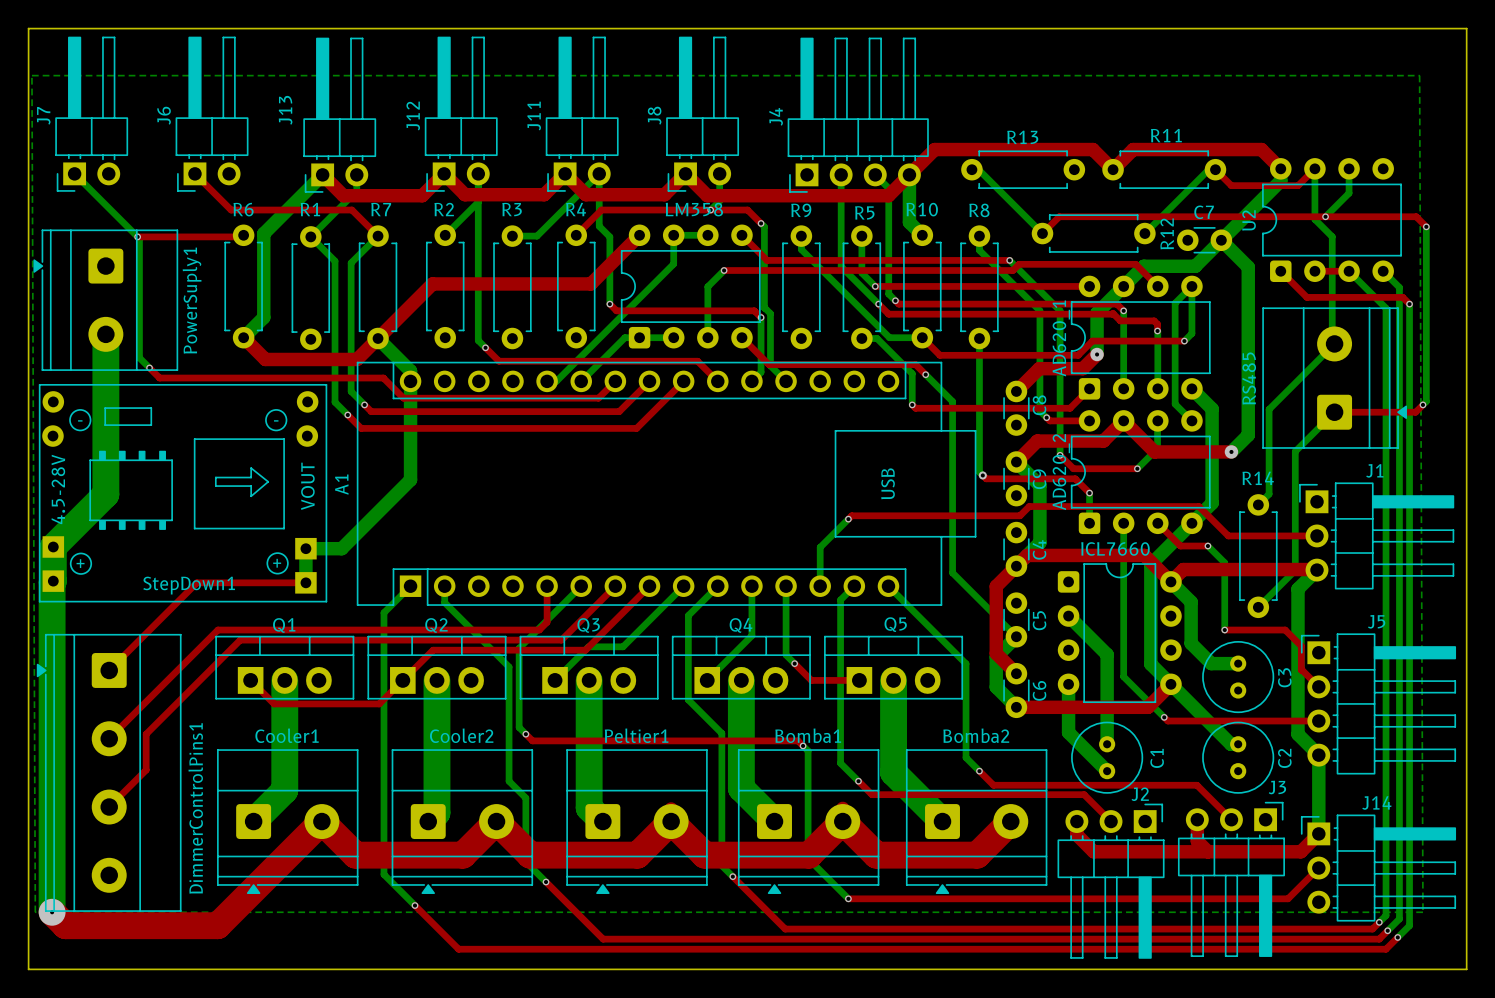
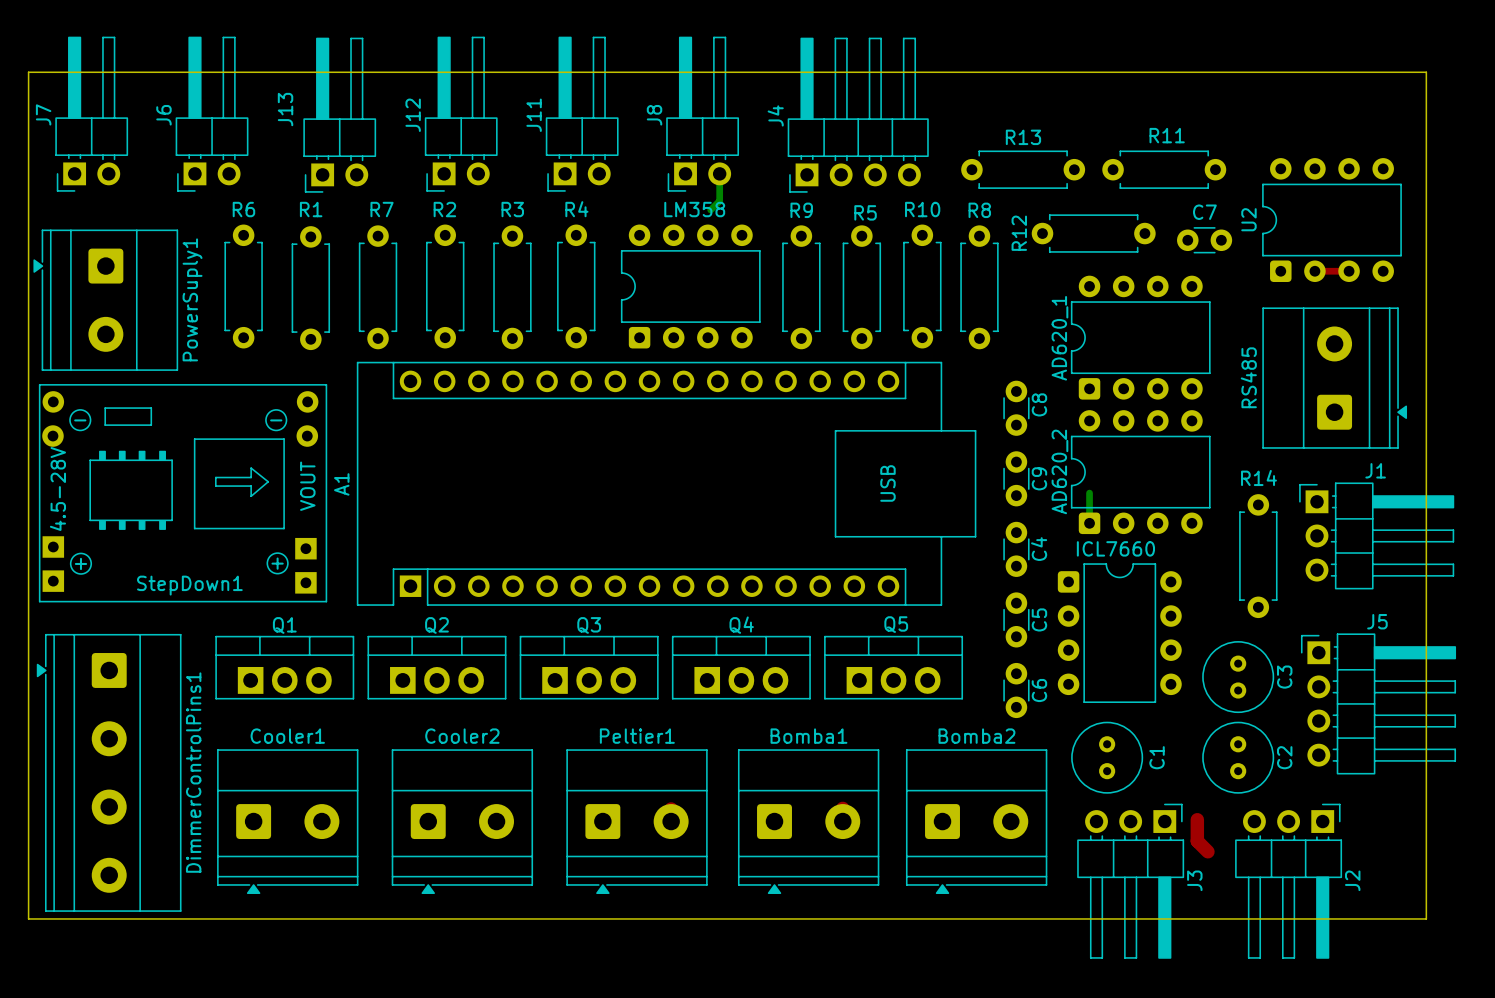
board edge: (28, 72) (28, 28) (1466, 28) (1466, 969) (28, 969) (28, 918) -> (28, 72) (1426, 72) (1426, 918) (28, 918)
bottom zone outline: (31, 75) (1419, 75) (1422, 912) (35, 912) (31, 75) -> none
top track: (1280, 168) (1261, 149) (1133, 149) (1113, 169) (1092, 149) (934, 149) (888, 195) (707, 195) (685, 173) (664, 194) (585, 194) (565, 173) (544, 194) (464, 194) (444, 173) (422, 195) (343, 195) (322, 174) -> none
bottom track: (1280, 168) (1280, 180) (1195, 266) (1143, 266) (1097, 313) (1097, 354) -> none
top track: (1314, 168) (1298, 185) (1231, 185) (1215, 169) -> none
bottom track: (1314, 168) (1314, 219) (1332, 236) (1332, 341) (1334, 343) (1269, 409) (1269, 494) (1258, 504) -> none
bottom track: (1349, 168) (1349, 193) (1325, 216) -> none
bottom track: (971, 169) (978, 169) (1042, 233) -> none
bottom track: (1215, 169) (1208, 169) (1144, 233) -> none
bottom track: (74, 173) (139, 238) (139, 357) (149, 367) -> none
top track: (194, 173) (231, 210) (351, 210) (378, 236) -> none
bottom track: (478, 173) (478, 340) (485, 347) -> none
bottom track: (322, 174) (263, 233) (263, 317) (243, 337) -> none
bottom track: (356, 174) (356, 190) (310, 236) (335, 261) (335, 402) (347, 414) -> none
bottom track: (841, 174) (841, 266) (878, 304) -> none
bottom track: (875, 174) (888, 188) (888, 294) (895, 300) -> none
bottom track: (909, 174) (909, 222) (922, 235) -> none
bottom track: (478, 202) (445, 235) -> none
via: (710, 210) -> none
via: (1325, 216) -> none
top track: (761, 223) (747, 210) (601, 210) (576, 235) -> none
bottom track: (761, 223) (764, 226) (764, 308) (770, 313) (770, 365) (786, 381) -> none
via: (761, 223) -> none
top track: (1426, 226) (1416, 216) (1059, 216) (1042, 233) -> none
bottom track: (1426, 226) (1426, 401) (1422, 404) -> none
via: (1426, 226) -> none
R12 name position: R12 (1167, 233) -> R12 (1019, 233)
top track: (243, 235) (242, 236) (137, 236) -> none
top track: (639, 235) (590, 283) (432, 283) (357, 359) (265, 359) (243, 337) -> none
bottom track: (707, 235) (673, 235) (673, 264) (556, 381) (547, 381) -> none
top track: (741, 235) (767, 260) (1009, 260) -> none
via: (137, 236) -> none
bottom track: (378, 236) (351, 262) (351, 391) (364, 404) -> none
bottom track: (512, 236) (537, 236) (599, 173) (599, 226) (609, 236) (609, 304) -> none
bottom track: (801, 236) (801, 249) (889, 337) (922, 337) -> none
bottom track: (861, 236) (861, 272) (875, 286) -> none
bottom track: (979, 236) (979, 250) (1039, 310) (1039, 410) (1046, 417) -> none
bottom track: (1221, 240) (1248, 267) (1248, 435) (1231, 451) -> none
bottom track: (1009, 260) (1060, 310) (1060, 455) -> none
via: (1009, 260) -> none
top track: (724, 270) (1012, 270) (1019, 264) (1135, 264) (1157, 286) -> none
bottom track: (724, 270) (707, 286) (707, 337) -> none
via: (724, 270) -> none
top track: (1280, 271) (1306, 297) (1402, 297) (1409, 304) -> none
bottom track: (1349, 271) (1386, 308) (1386, 915) (1379, 922) -> none
bottom track: (1383, 271) (1399, 287) (1399, 918) (1387, 930) -> none
top track: (875, 286) (1089, 286) -> none
via: (875, 286) -> none
top track: (895, 300) (898, 304) (1116, 304) (1123, 310) -> none
via: (895, 300) -> none
top track: (609, 304) (616, 310) (754, 310) (761, 317) -> none
via: (609, 304) -> none
top track: (878, 304) (888, 314) (1113, 313) (1120, 320) (1154, 320) (1157, 324) (1157, 330) -> none
via: (878, 304) -> none
bottom track: (1409, 304) (1409, 925) (1397, 937) -> none
via: (1409, 304) -> none
bottom track: (1123, 310) (1123, 388) -> none
via: (1123, 310) -> none
bottom track: (761, 317) (761, 372) (751, 381) -> none
via: (761, 317) -> none
bottom track: (1157, 330) (1157, 388) -> none
via: (1157, 330) -> none
bottom track: (105, 334) (105, 494) (53, 546) (52, 912) -> none
bottom track: (673, 337) (624, 337) (581, 381) -> none
top track: (741, 337) (768, 364) (915, 364) (925, 374) -> none
top track: (922, 337) (939, 355) (1078, 355) (1092, 341) (1184, 341) -> none
bottom track: (378, 338) (410, 371) (410, 479) (341, 548) (305, 548) (305, 582) -> none
bottom track: (861, 338) (877, 338) (912, 373) (912, 404) -> none
bottom track: (979, 338) (979, 472) (982, 475) -> none
bottom track: (1184, 341) (1191, 333) (1191, 286) (1175, 303) (1175, 404) (1191, 420) -> none
via: (1184, 341) -> none
top track: (485, 347) (498, 361) (697, 361) (717, 381) -> none
via: (485, 347) -> none
top track: (1097, 354) (1082, 368) (1039, 368) (1016, 391) -> none
via: (1097, 354) -> none
top track: (149, 367) (159, 378) (383, 378) (403, 398) (598, 398) (615, 381) -> none
via: (149, 367) -> none
bottom track: (925, 374) (952, 401) (952, 572) (1016, 636) (996, 656) (996, 687) (1016, 707) -> none
via: (925, 374) -> none
top track: (649, 381) (619, 411) (371, 411) (364, 404) -> none
top track: (683, 381) (636, 428) (361, 428) (347, 414) -> none
top track: (1089, 388) (1070, 408) (915, 408) (912, 404) -> none
bottom track: (1191, 388) (1212, 409) (1212, 503) (1150, 564) (1150, 664) (1230, 744) (1238, 744) -> none
via: (364, 404) -> none
via: (912, 404) -> none
top track: (1422, 404) (1415, 412) (1334, 412) -> none
via: (1422, 404) -> none
bottom track: (1334, 412) (1295, 451) (1295, 570) (1258, 607) -> none
via: (347, 414) -> none
top track: (1046, 417) (1049, 420) (1089, 420) -> none
via: (1046, 417) -> none
bottom track: (1157, 420) (1157, 448) (1137, 468) -> none
top track: (1231, 451) (1154, 451) (1123, 420) (1103, 441) (1037, 441) (1016, 462) -> none
via: (1231, 451) -> none
top track: (1060, 455) (1073, 468) (1137, 468) -> none
via: (1060, 455) -> none
bottom track: (1016, 462) (1039, 485) (1039, 542) (1016, 566) -> none
via: (1137, 468) -> none
top track: (982, 475) (986, 478) (1075, 478) (1089, 493) -> none
via: (982, 475) -> none
via: (1089, 493) -> none
top track: (848, 519) (851, 515) (1020, 515) (1029, 506) (1198, 506) (1228, 535) (1317, 535) -> none
bottom track: (848, 519) (820, 547) (820, 586) -> none
via: (848, 519) -> none
bottom track: (1123, 523) (1123, 676) (1164, 717) -> none
top track: (1157, 523) (1180, 546) (1207, 546) -> none
bottom track: (1207, 546) (1224, 562) (1224, 630) -> none
via: (1207, 546) -> none
top track: (1317, 570) (1183, 569) (1170, 581) (1144, 555) (1027, 555) (996, 586) (996, 653) (1016, 673) -> none
bottom track: (1317, 570) (1297, 589) (1297, 734) (1318, 755) (1318, 833) -> none
bottom track: (1170, 581) (1191, 602) (1191, 643) (1211, 663) (1238, 663) -> none
top track: (305, 582) (196, 582) (109, 670) -> none
bottom track: (410, 586) (383, 612) (383, 874) (414, 905) -> none
bottom track: (444, 586) (444, 602) (509, 666) (509, 781) (525, 798) (525, 861) (546, 882) -> none
top track: (547, 586) (547, 622) (539, 630) (217, 630) (109, 738) -> none
bottom track: (581, 586) (519, 648) (519, 727) (525, 734) -> none
top track: (615, 586) (561, 640) (240, 640) (146, 734) (146, 770) (109, 807) -> none
top track: (649, 586) (585, 650) (433, 650) (379, 703) (274, 703) (250, 680) -> none
bottom track: (683, 586) (623, 646) (588, 646) (555, 680) -> none
bottom track: (717, 586) (688, 615) (688, 699) (721, 733) (721, 865) (732, 876) -> none
bottom track: (751, 586) (751, 635) (707, 680) -> none
bottom track: (786, 586) (786, 655) (794, 663) -> none
bottom track: (854, 586) (840, 599) (840, 763) (858, 781) -> none
bottom track: (888, 586) (966, 663) (966, 757) (979, 771) -> none
bottom track: (1068, 616) (1107, 654) (1107, 744) -> none
top track: (1224, 630) (1285, 630) (1301, 646) (1301, 670) (1318, 686) -> none
via: (1224, 630) -> none
top track: (794, 663) (811, 680) (859, 680) -> none
via: (794, 663) -> none
bottom track: (284, 680) (284, 790) (253, 821) -> none
bottom track: (436, 680) (436, 812) (428, 821) -> none
bottom track: (589, 680) (589, 807) (602, 821) -> none
bottom track: (741, 680) (741, 788) (774, 821) -> none
bottom track: (893, 680) (893, 772) (942, 821) -> none
bottom track: (1068, 684) (1068, 732) (1107, 771) -> none
top track: (1170, 684) (1148, 707) (1016, 707) -> none
top track: (1164, 717) (1167, 721) (1318, 721) -> none
via: (1164, 717) -> none
top track: (525, 734) (532, 740) (798, 740) (803, 745) -> none
via: (525, 734) -> none
bottom track: (803, 745) (808, 750) (808, 858) (848, 898) -> none
via: (803, 745) -> none
top track: (979, 771) (993, 785) (1196, 785) (1231, 819) -> none
via: (979, 771) -> none
top track: (858, 781) (871, 794) (1084, 794) (1111, 821) -> none
via: (858, 781) -> none
J3 name rotation: 0° (1277, 787) -> 90° counterclockwise (1194, 880)
J3 name position: J3 (1277, 787) -> J3 (1194, 880)
J2 name rotation: 0° (1140, 794) -> 90° counterclockwise (1352, 880)
J2 name position: J2 (1140, 794) -> J2 (1352, 880)
DimmerControlPins1 name position: DimmerControlPins1 (195, 808) -> DimmerControlPins1 (193, 772)
top track: (1010, 821) (977, 855) (876, 855) (842, 821) (809, 855) (704, 855) (671, 821) (637, 855) (530, 855) (496, 821) (462, 855) (355, 855) (321, 821) (217, 925) (65, 925) (52, 912) -> none
top track: (1076, 821) (1076, 834) (1093, 851) (1300, 851) (1318, 833) -> none
top track: (1318, 868) (1288, 898) (848, 898) -> none
J14: (1378, 868) -> none
top track: (732, 876) (785, 929) (1372, 929) (1379, 922) -> none
via: (732, 876) -> none
J3 position: (1231, 879) -> (1130, 881)
J2 position: (1111, 881) -> (1288, 881)
top track: (546, 882) (603, 939) (1379, 939) (1387, 930) -> none
via: (546, 882) -> none
via: (848, 898) -> none
top track: (414, 905) (458, 949) (1386, 949) (1397, 937) -> none
via: (414, 905) -> none
via: (52, 912) -> none
via: (1379, 922) -> none
via: (1387, 930) -> none
via: (1397, 937) -> none

